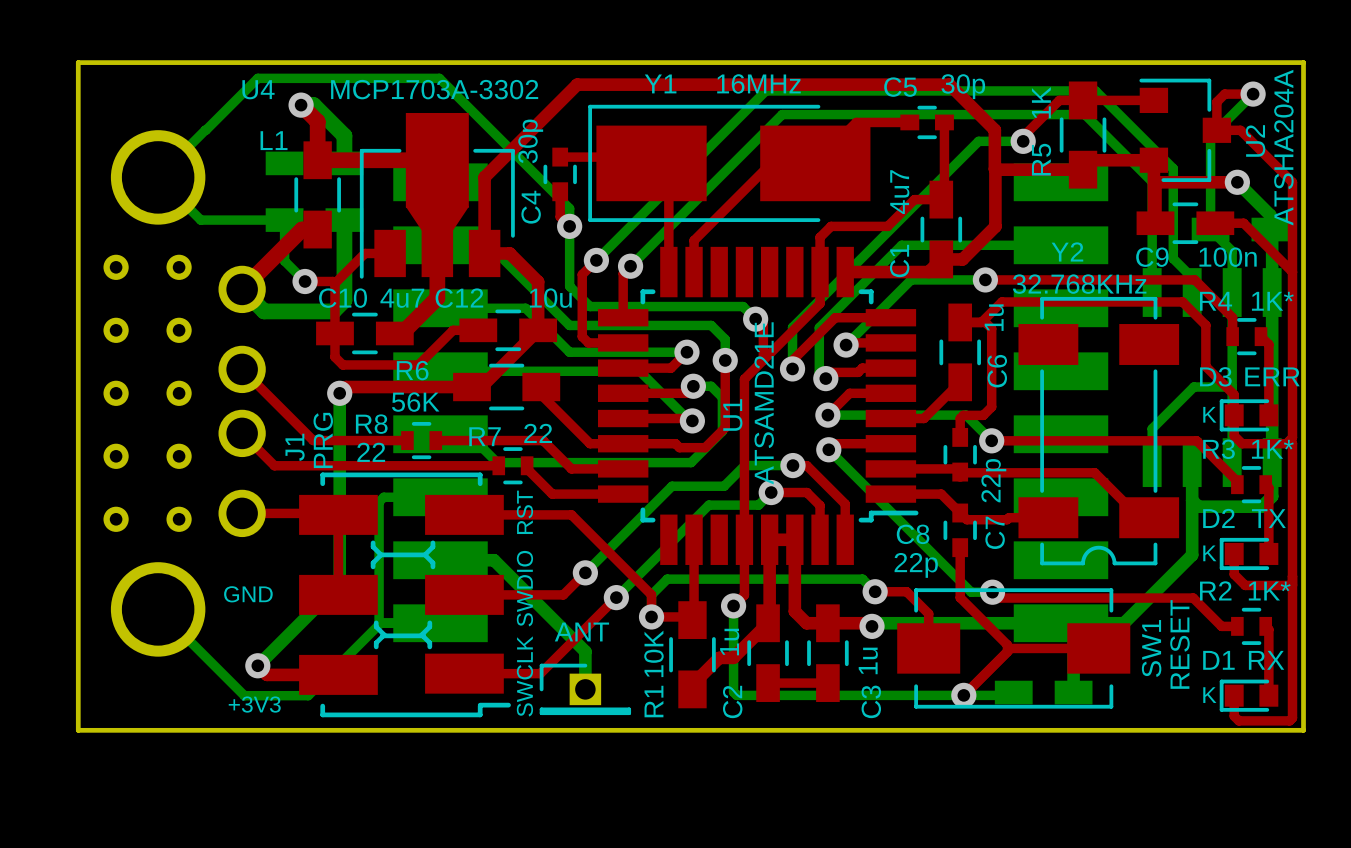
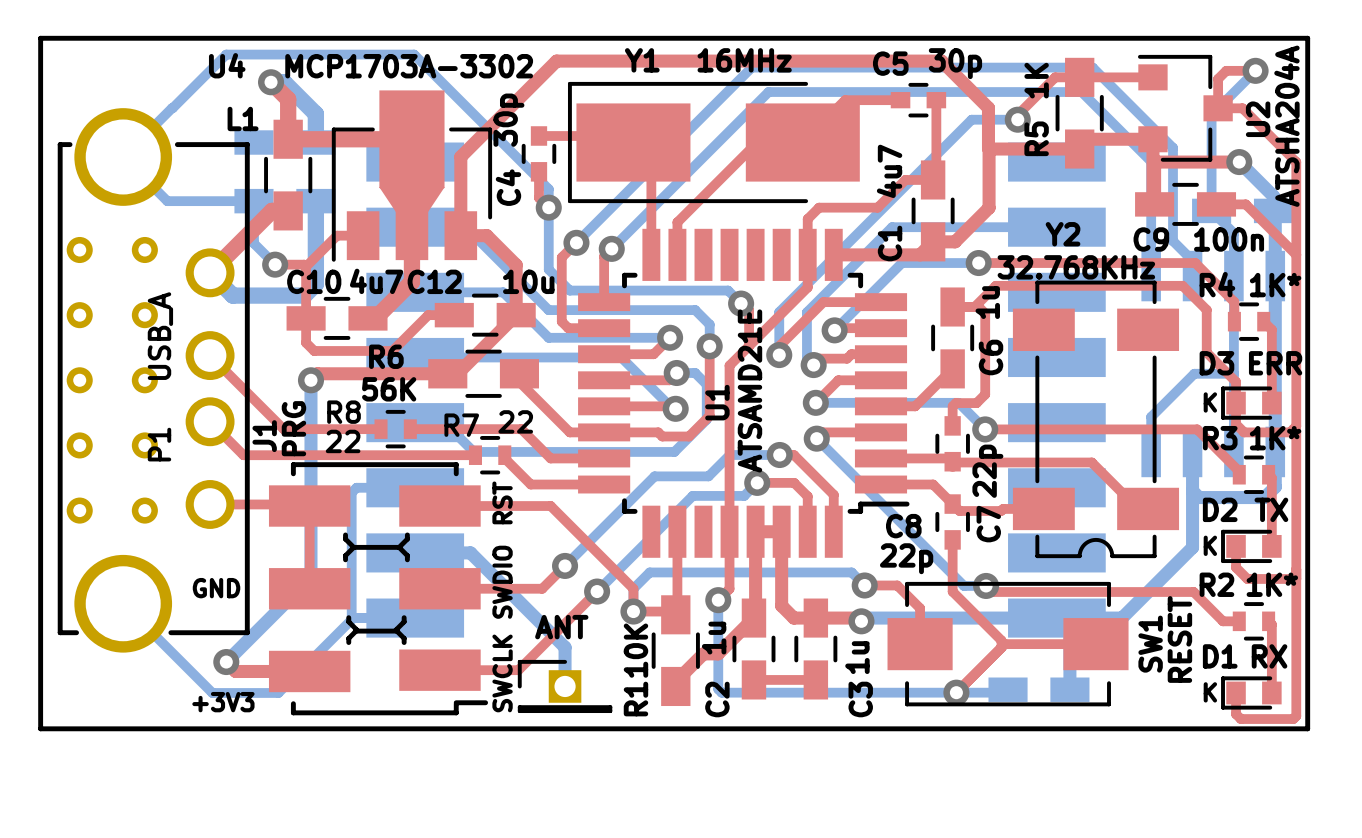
P1: none -> USB_A (153, 380)

